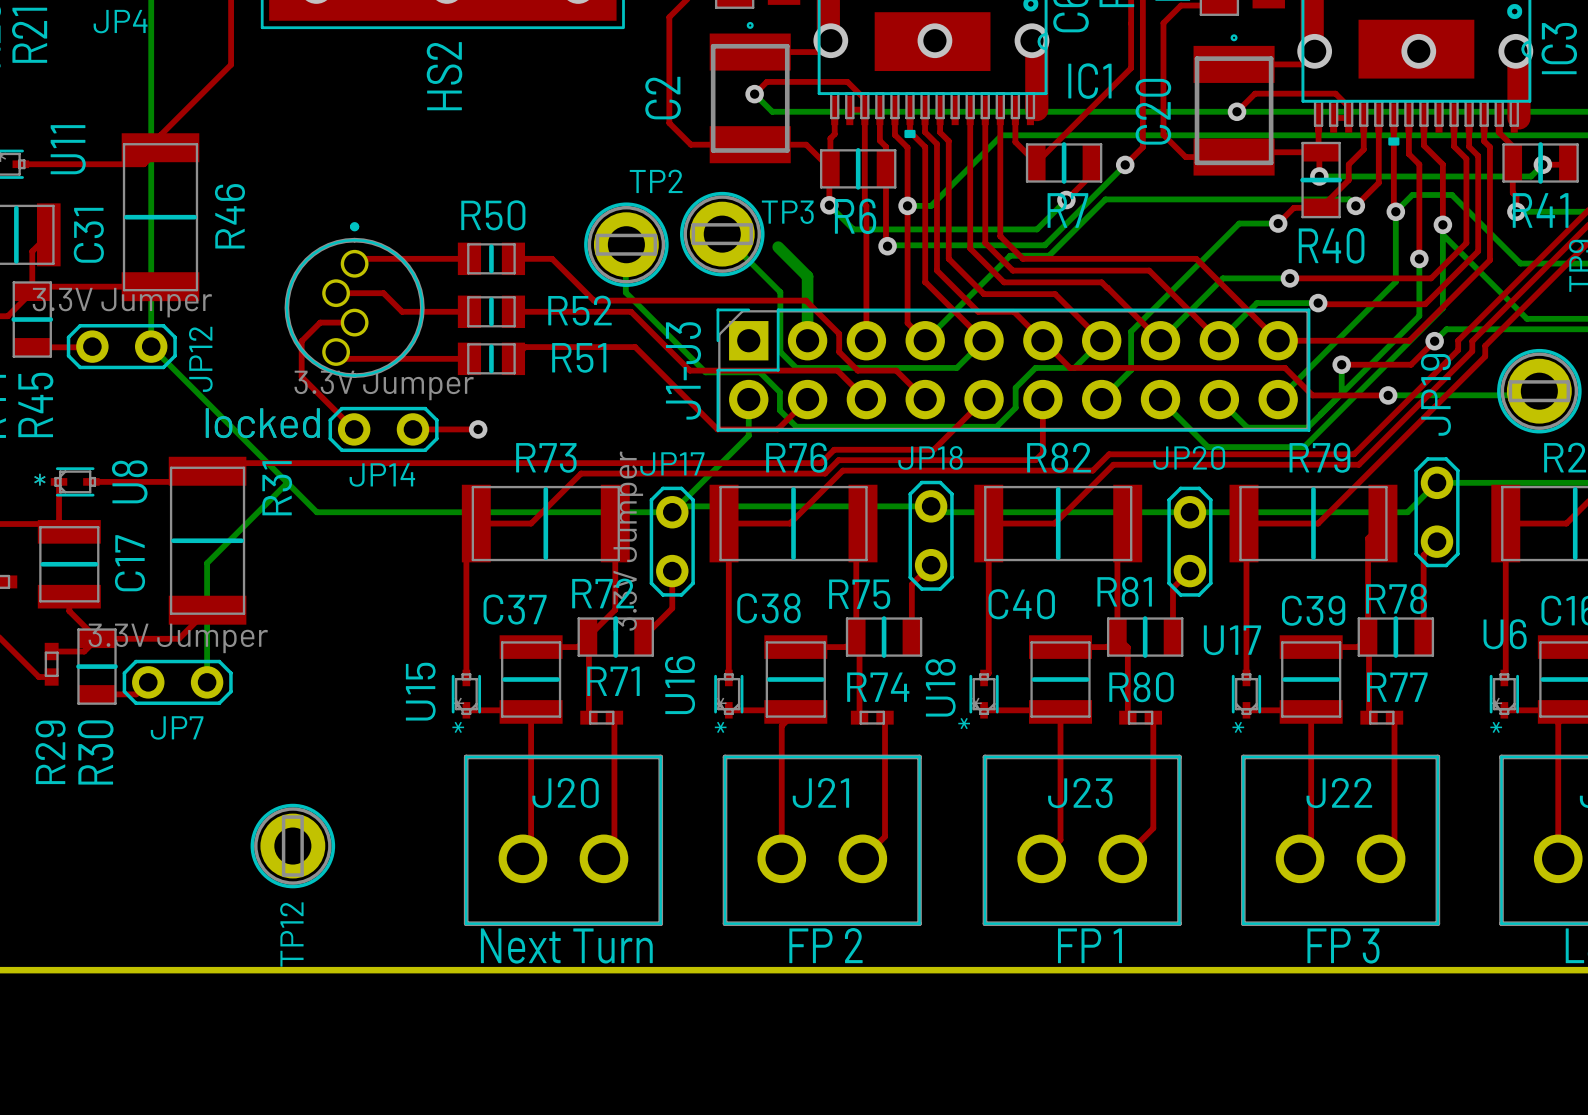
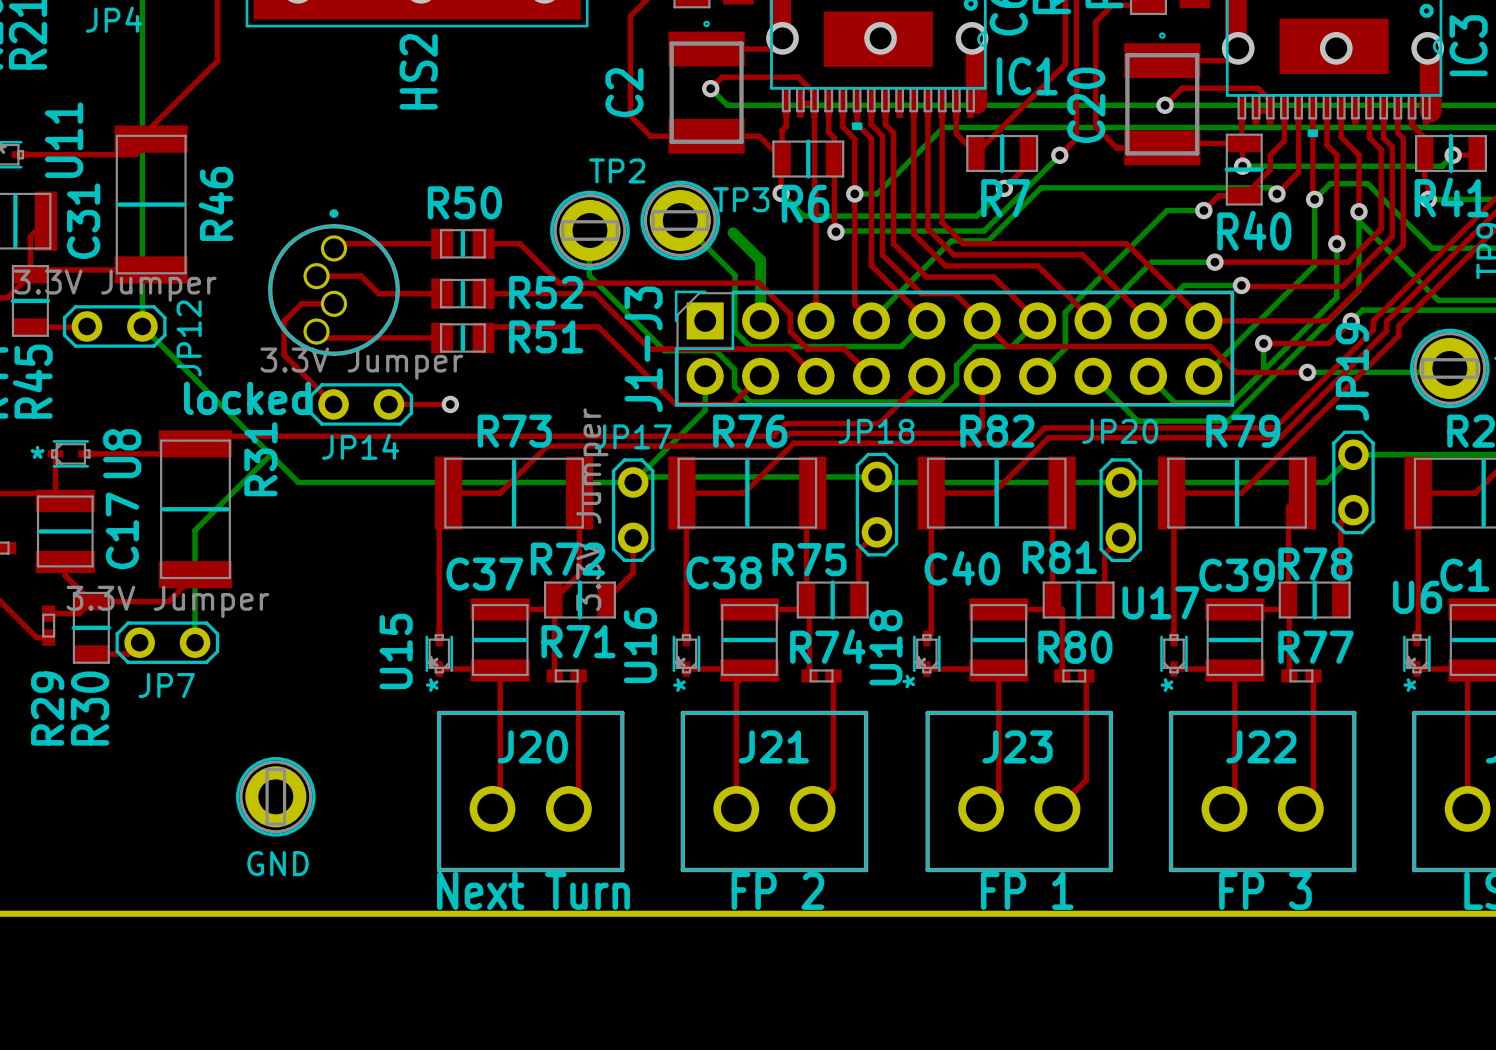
TP12 value: none -> GND (278, 863)
TP12 name: TP12 (291, 934) -> none

